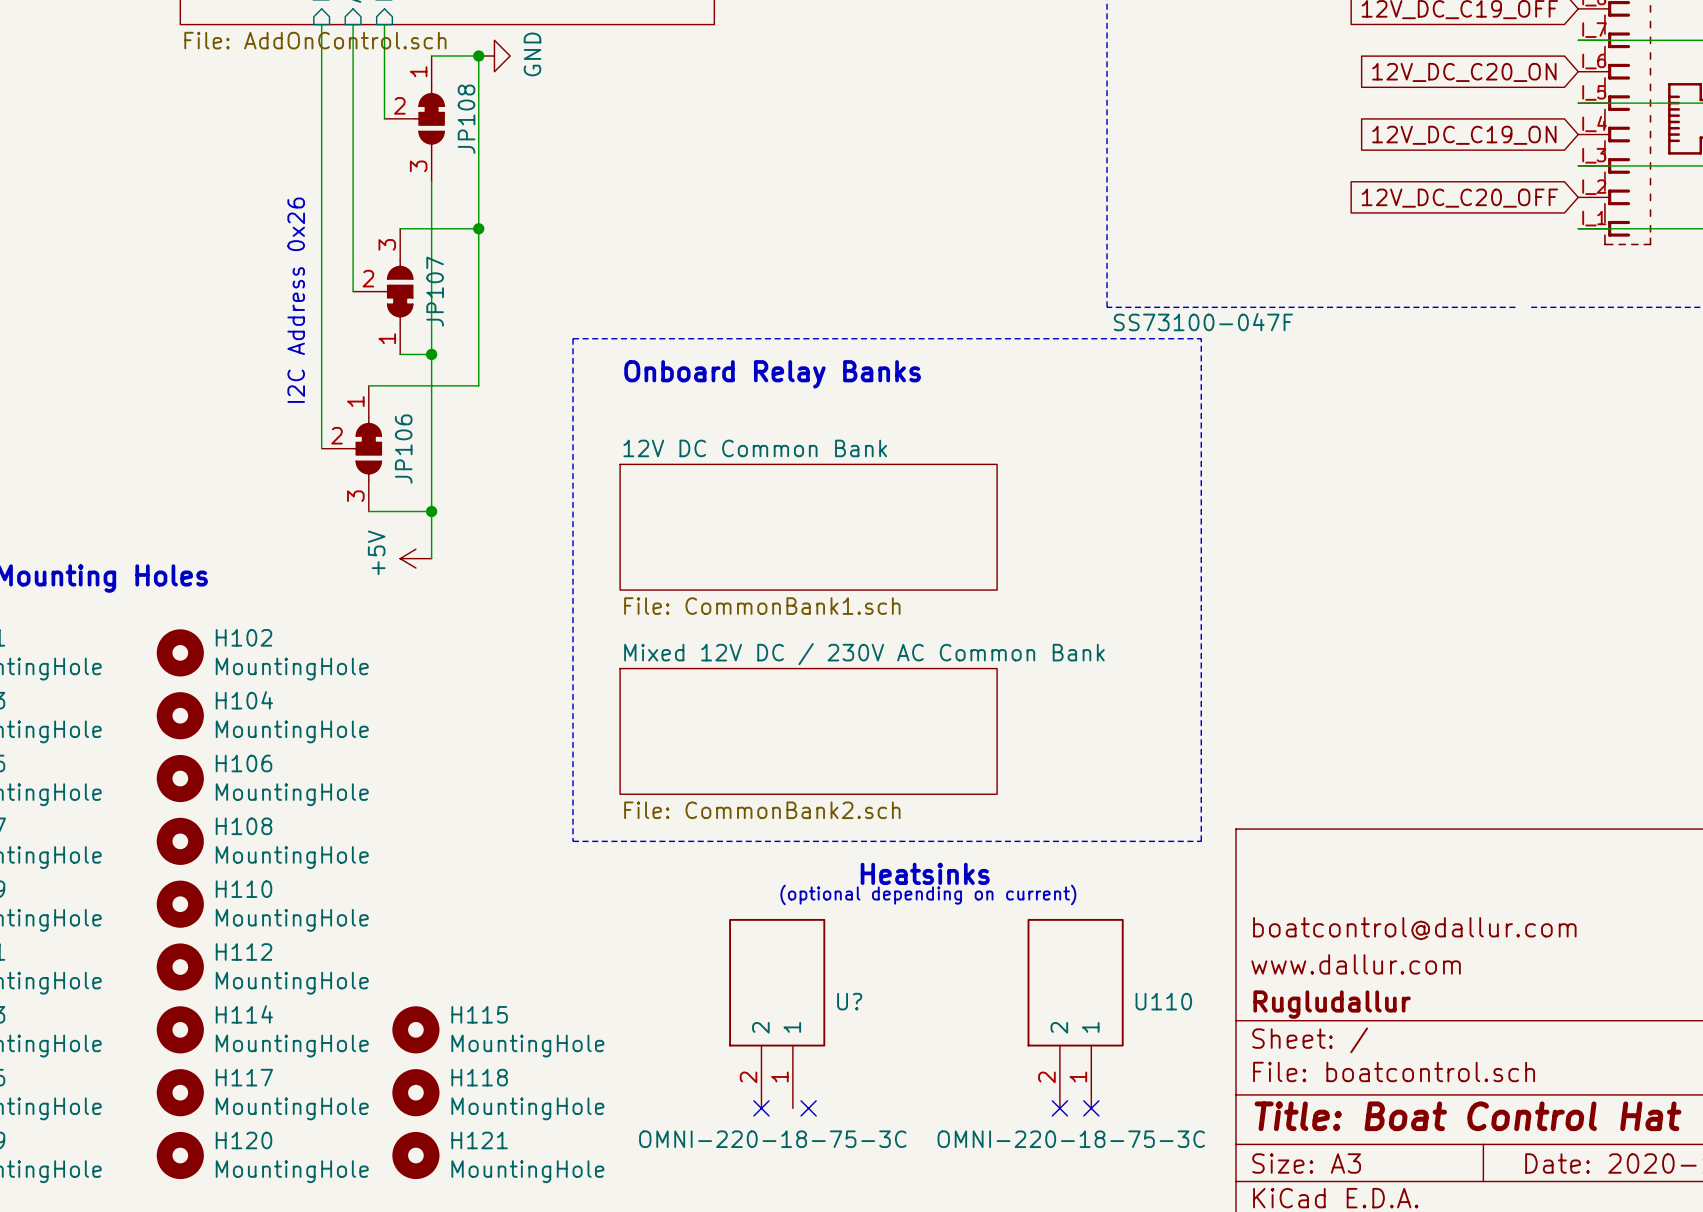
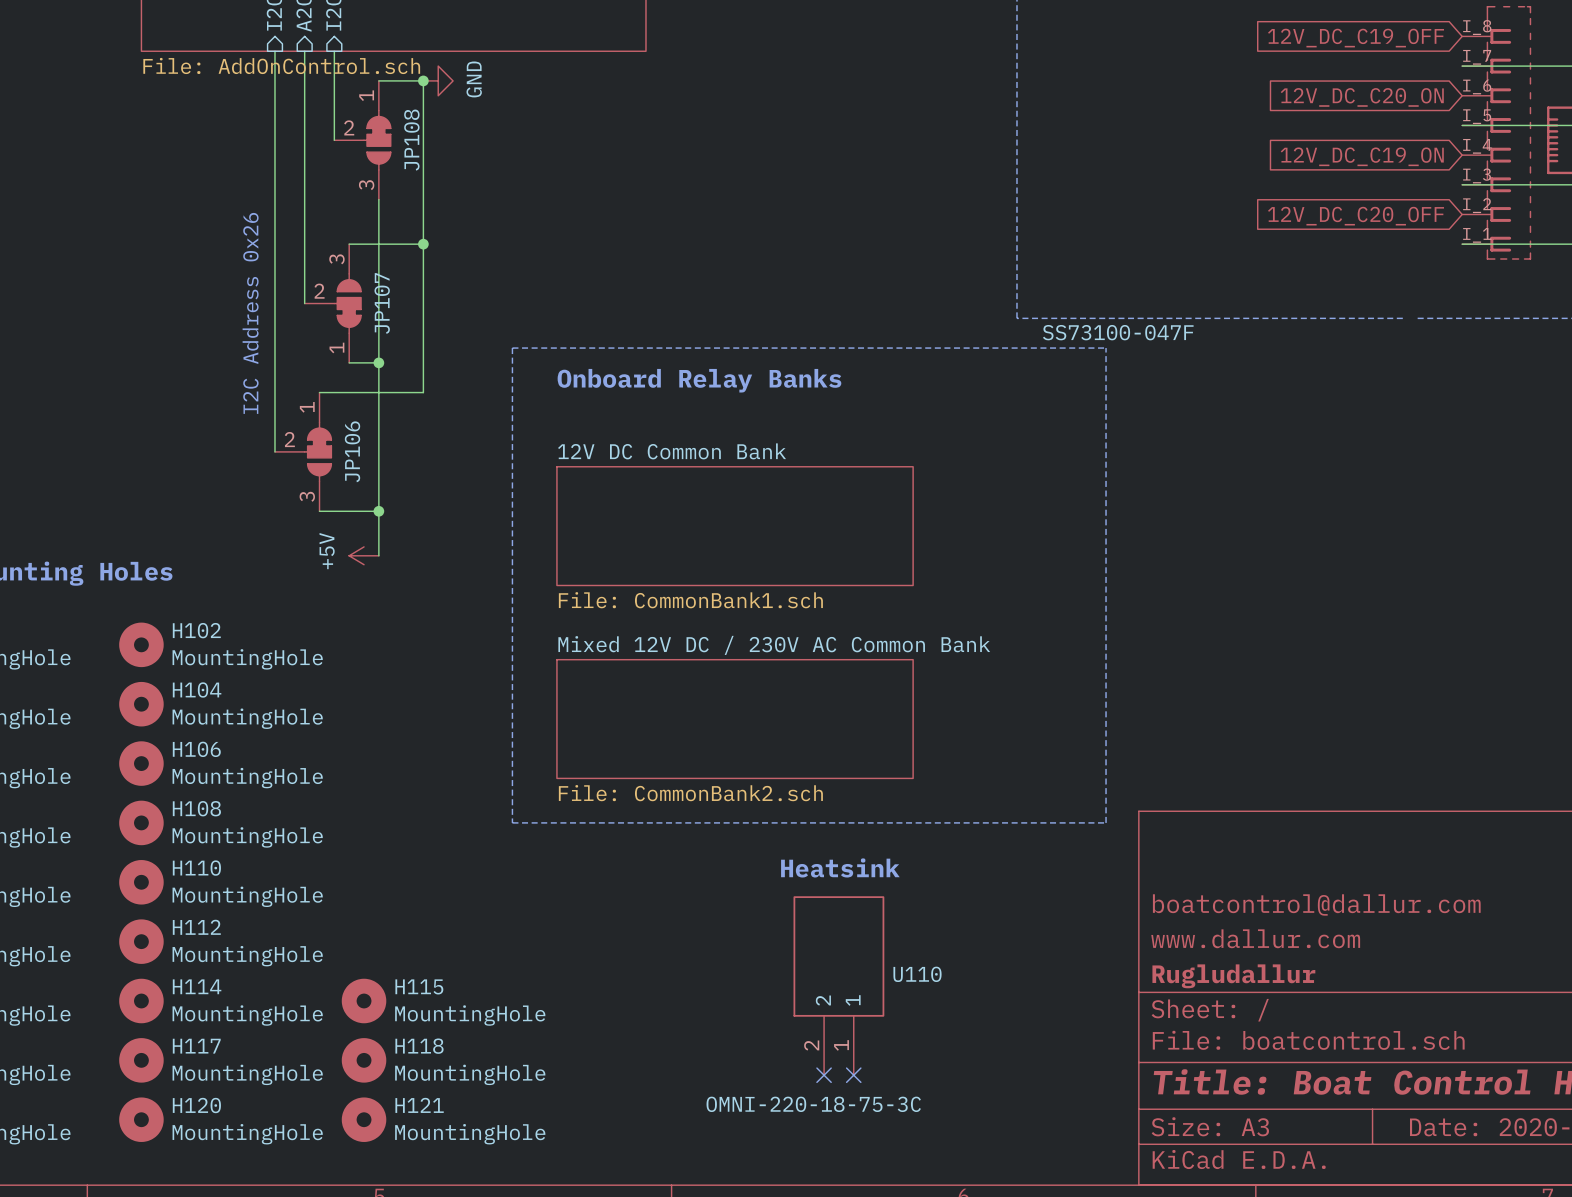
text: Heatsinks (925, 873) -> Heatsink (840, 867)
text: (optional depending on current) (928, 894) -> none
U?: OMNI-220-18-75-3C (777, 1013) -> none
U110 position: (1075, 1013) -> (838, 985)
no-connect mark: (761, 1108) -> none
no-connect mark: (808, 1108) -> none
no-connect mark: none -> (824, 1075)
no-connect mark: none -> (853, 1075)
no-connect mark: (1059, 1108) -> none
no-connect mark: (1091, 1108) -> none

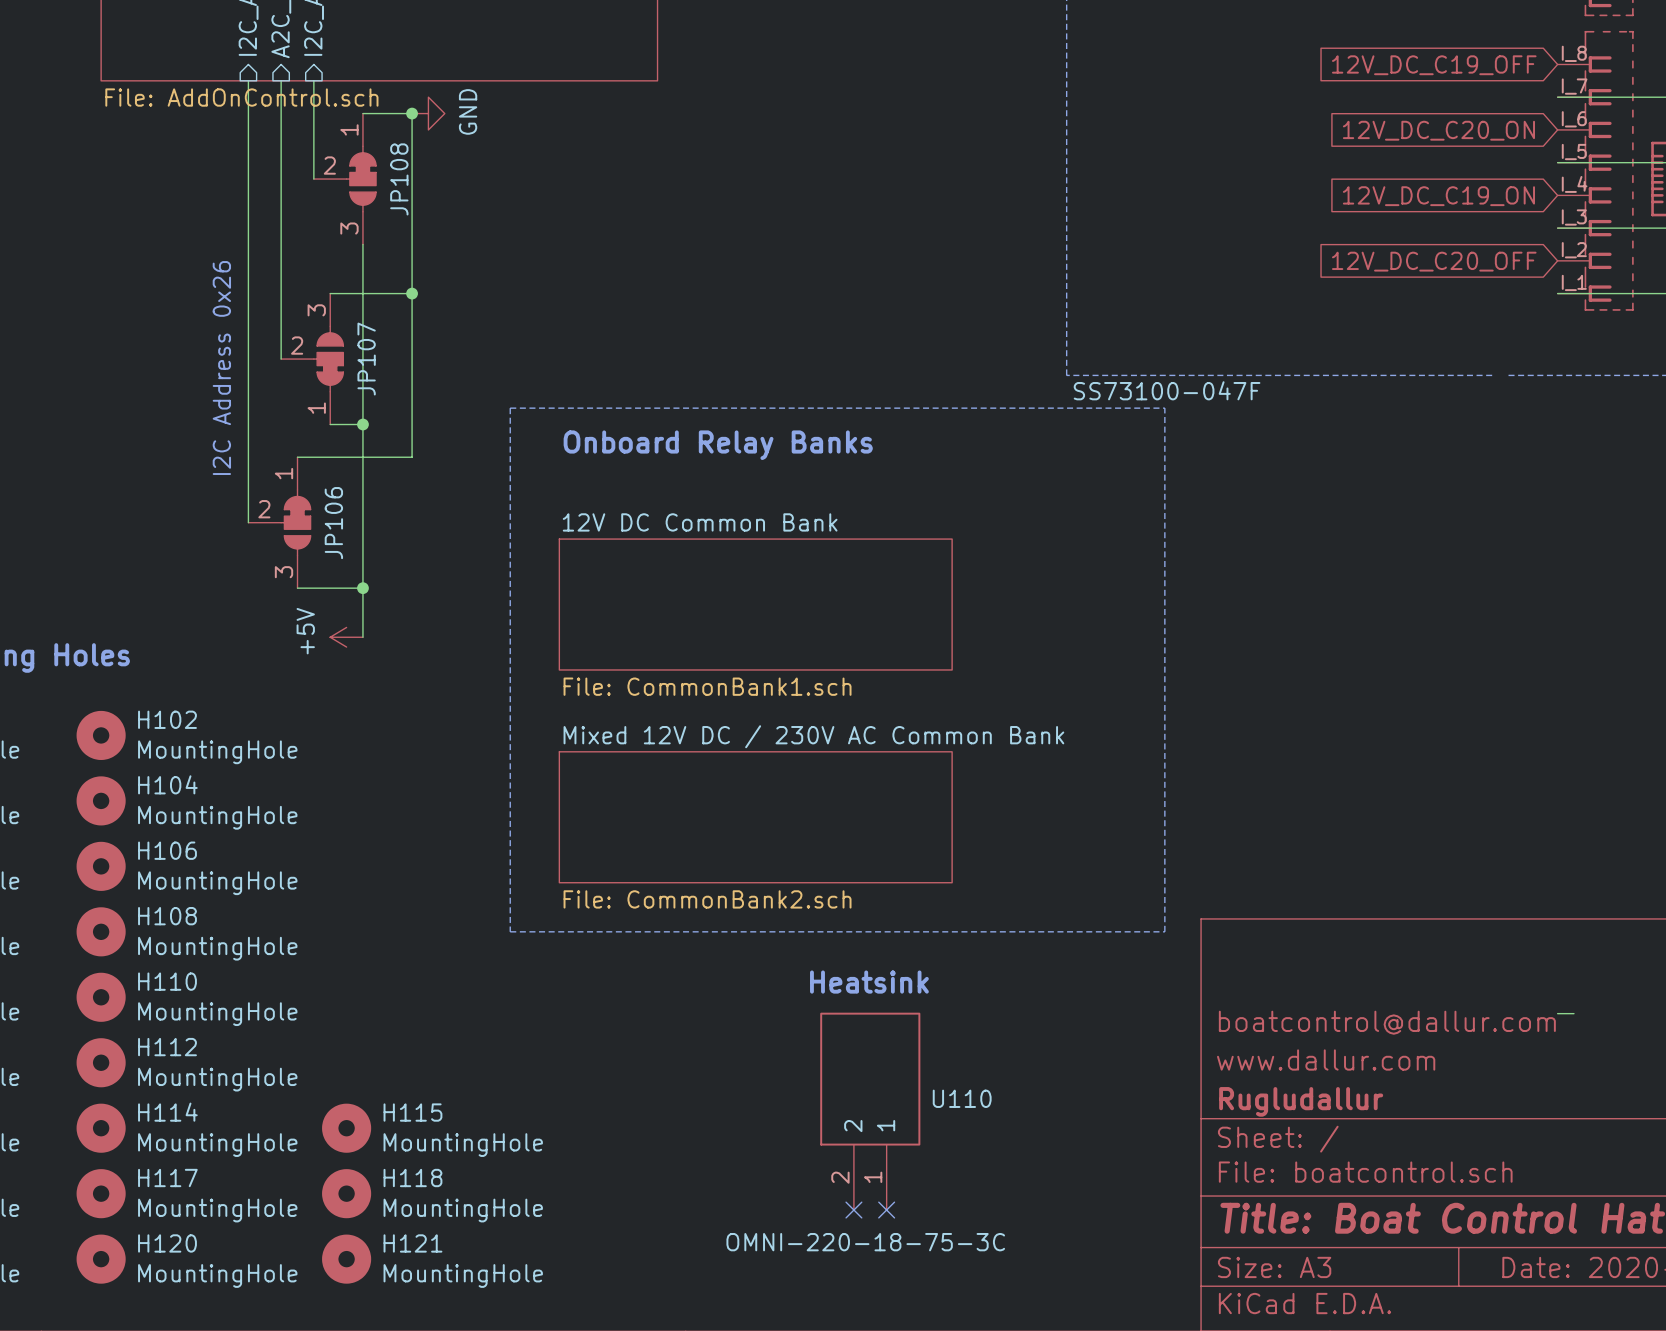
wire: none -> (1557, 1013) (1573, 1013)

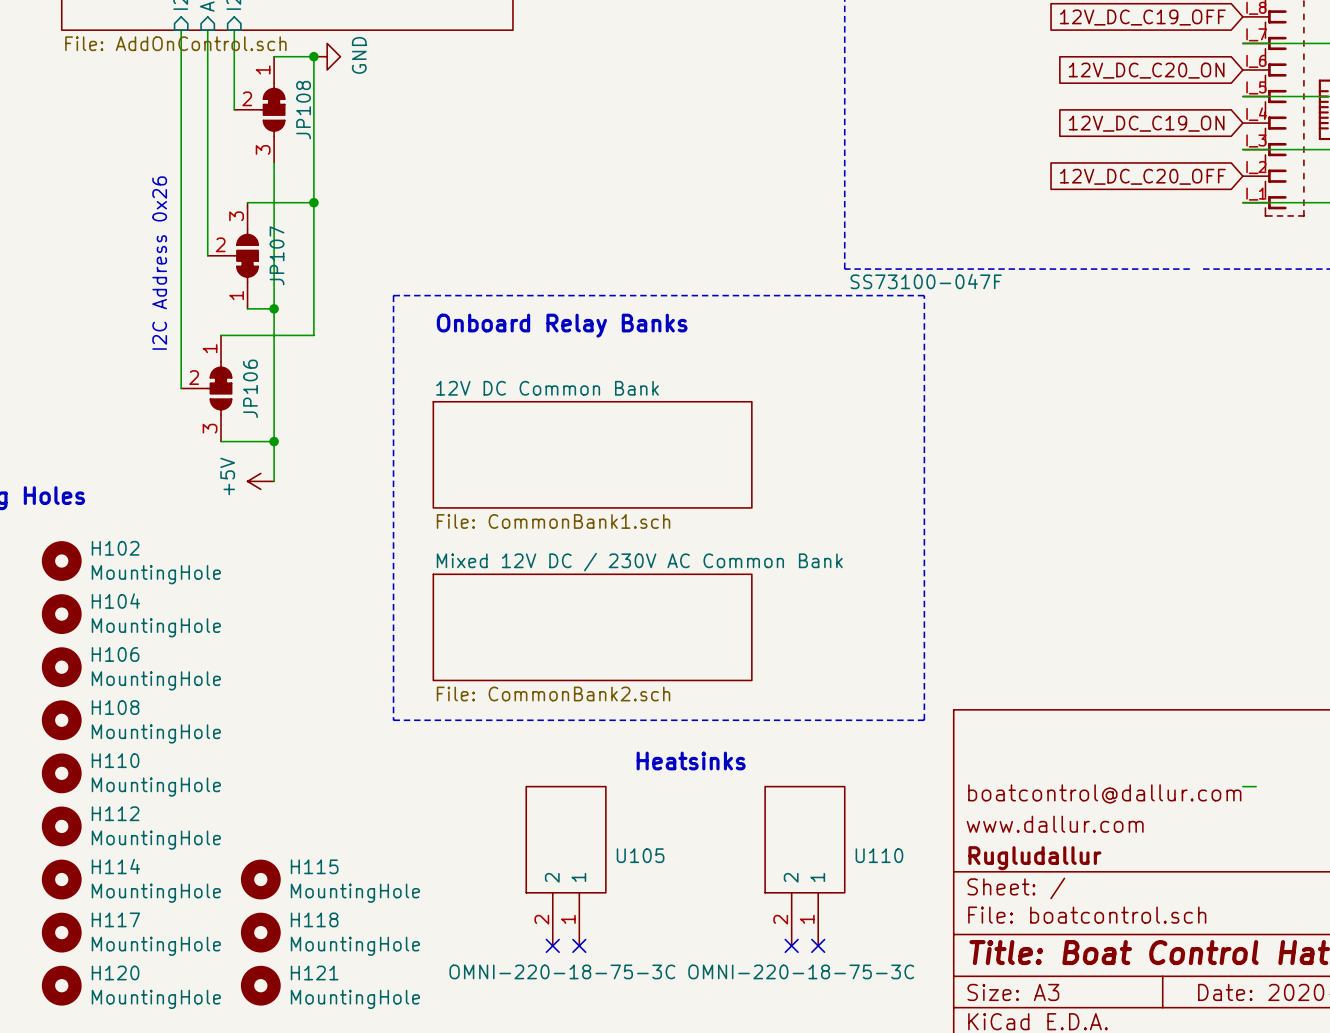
text: Heatsink (869, 982) -> Heatsinks (691, 761)
U105: none -> OMNI-220-18-75-3C (566, 865)
U110 position: (870, 1111) -> (804, 865)
no-connect mark: none -> (552, 945)
no-connect mark: none -> (579, 945)
no-connect mark: (853, 1210) -> none
no-connect mark: (886, 1210) -> none
no-connect mark: none -> (791, 945)
no-connect mark: none -> (818, 945)

